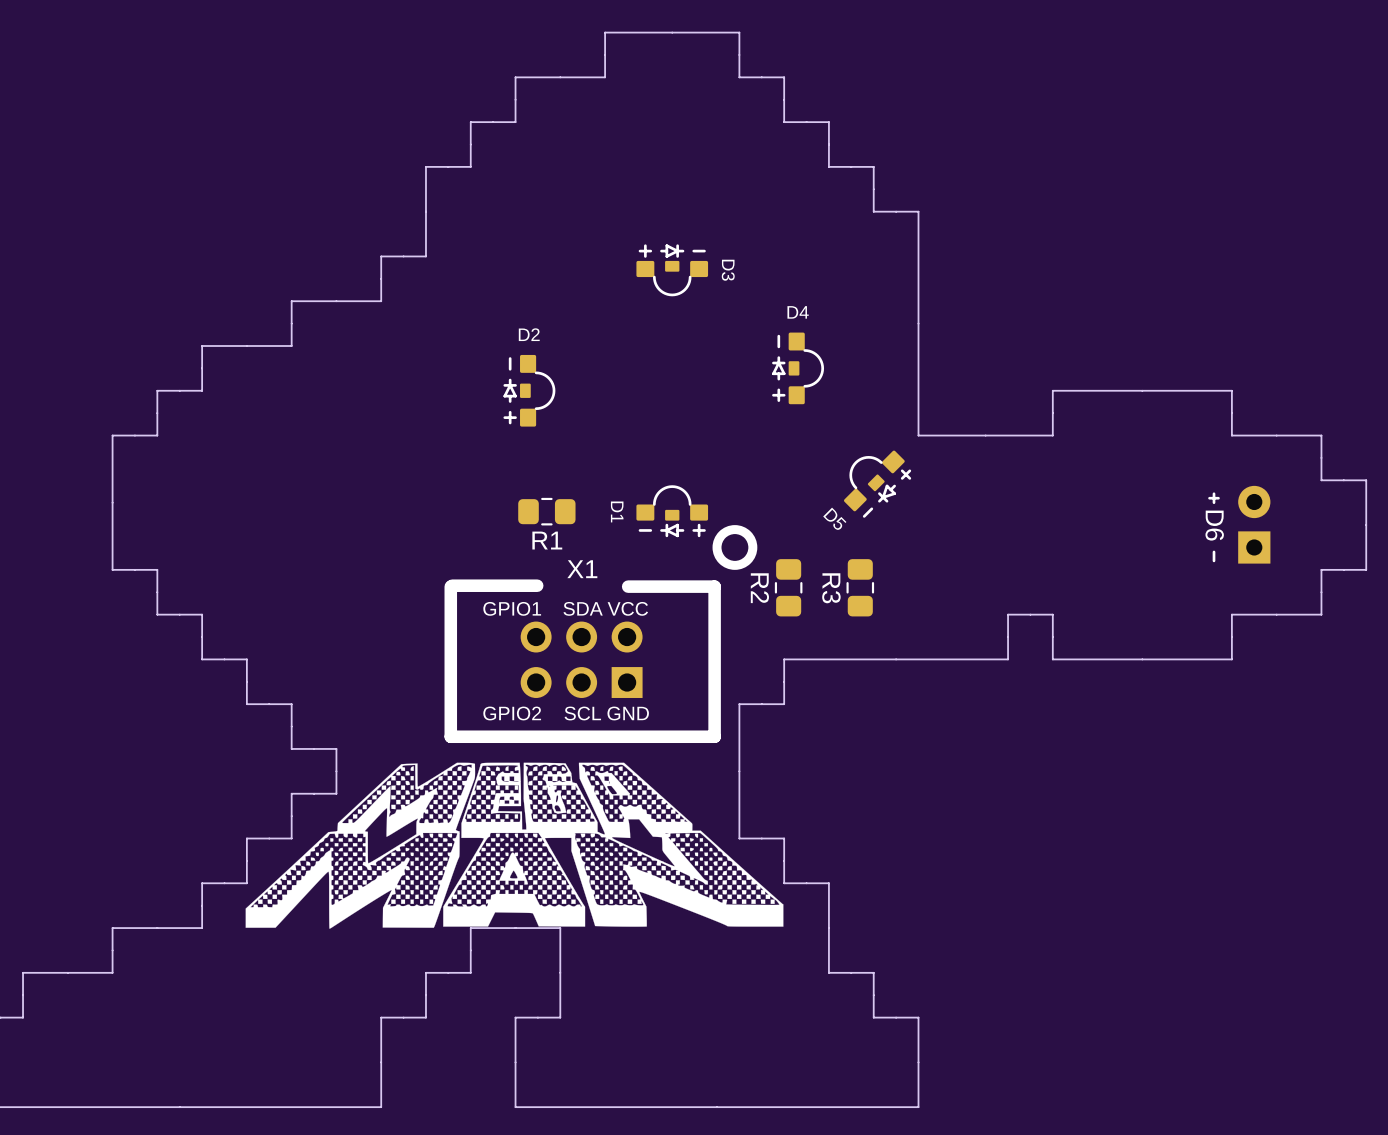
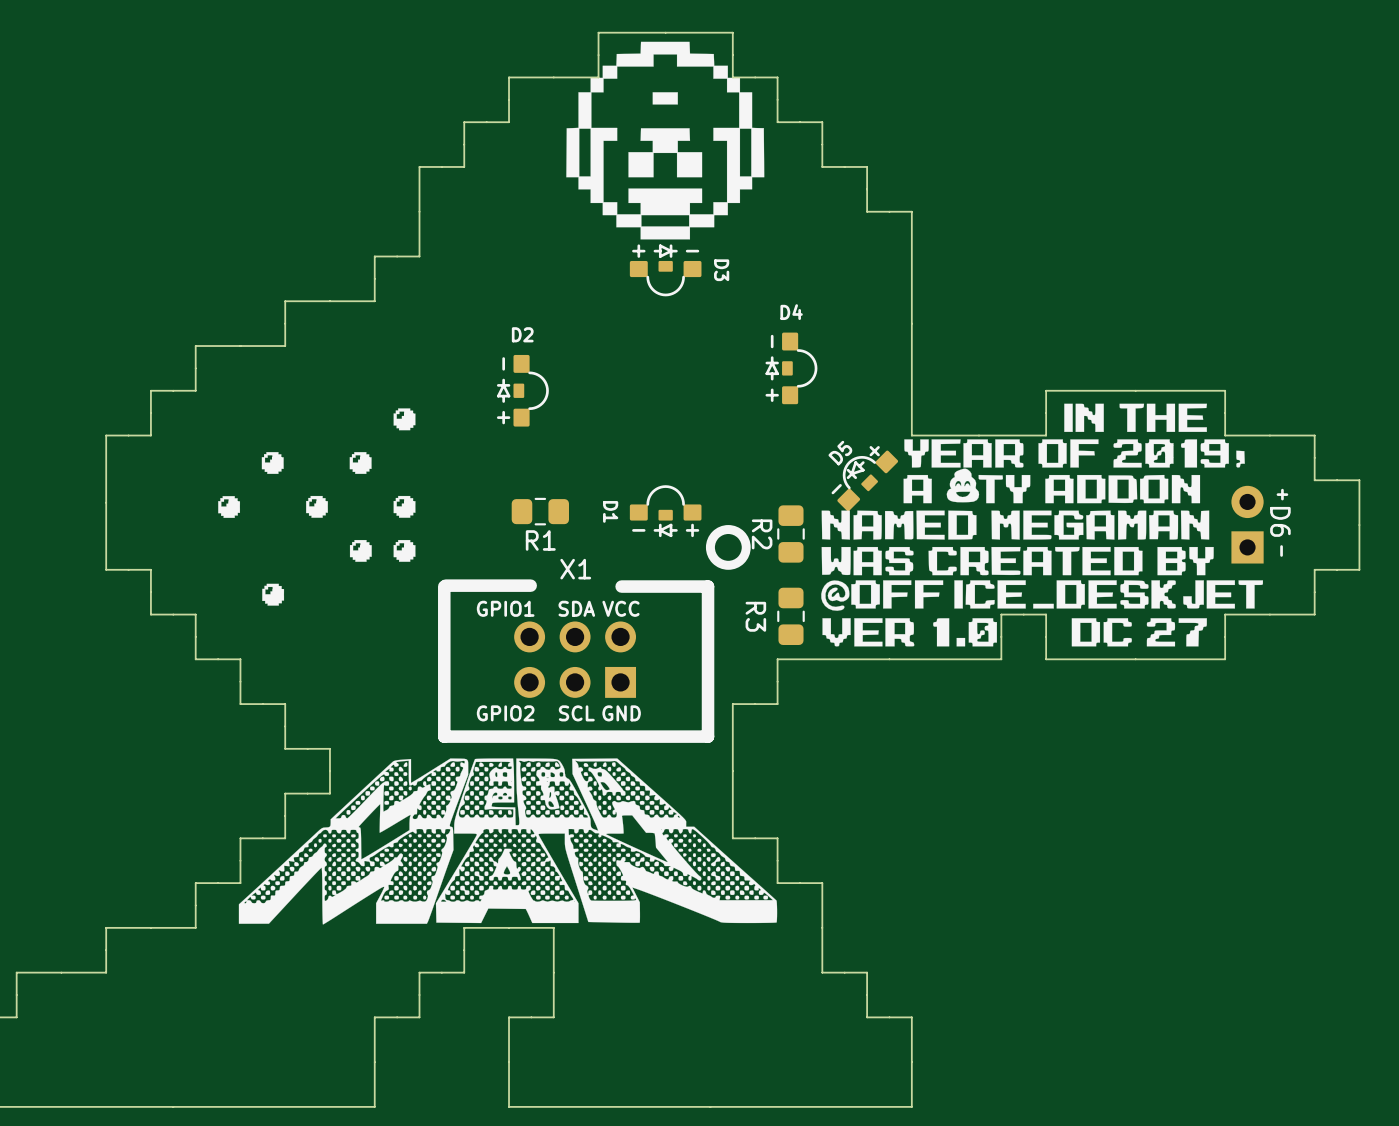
drawing: none -> [218, 41, 1263, 925]
D5 footprint: [843, 450, 912, 518] -> [831, 446, 899, 512]
line: (1214, 493) (1214, 502) -> (1282, 490) (1282, 499)
line: (1218, 498) (1209, 498) -> (1286, 494) (1277, 494)
D5 name position: D5 (834, 518) -> D5 (840, 453)
D6 name position: D6 (1214, 525) -> D6 (1280, 521)
line: (1214, 551) (1214, 560) -> (1281, 546) (1281, 555)
R2 position: (788, 587) -> (790, 533)
R3 position: (860, 587) -> (790, 616)
R3 name position: R3 (831, 588) -> R3 (755, 616)
drawing: [245, 762, 784, 929] -> none

